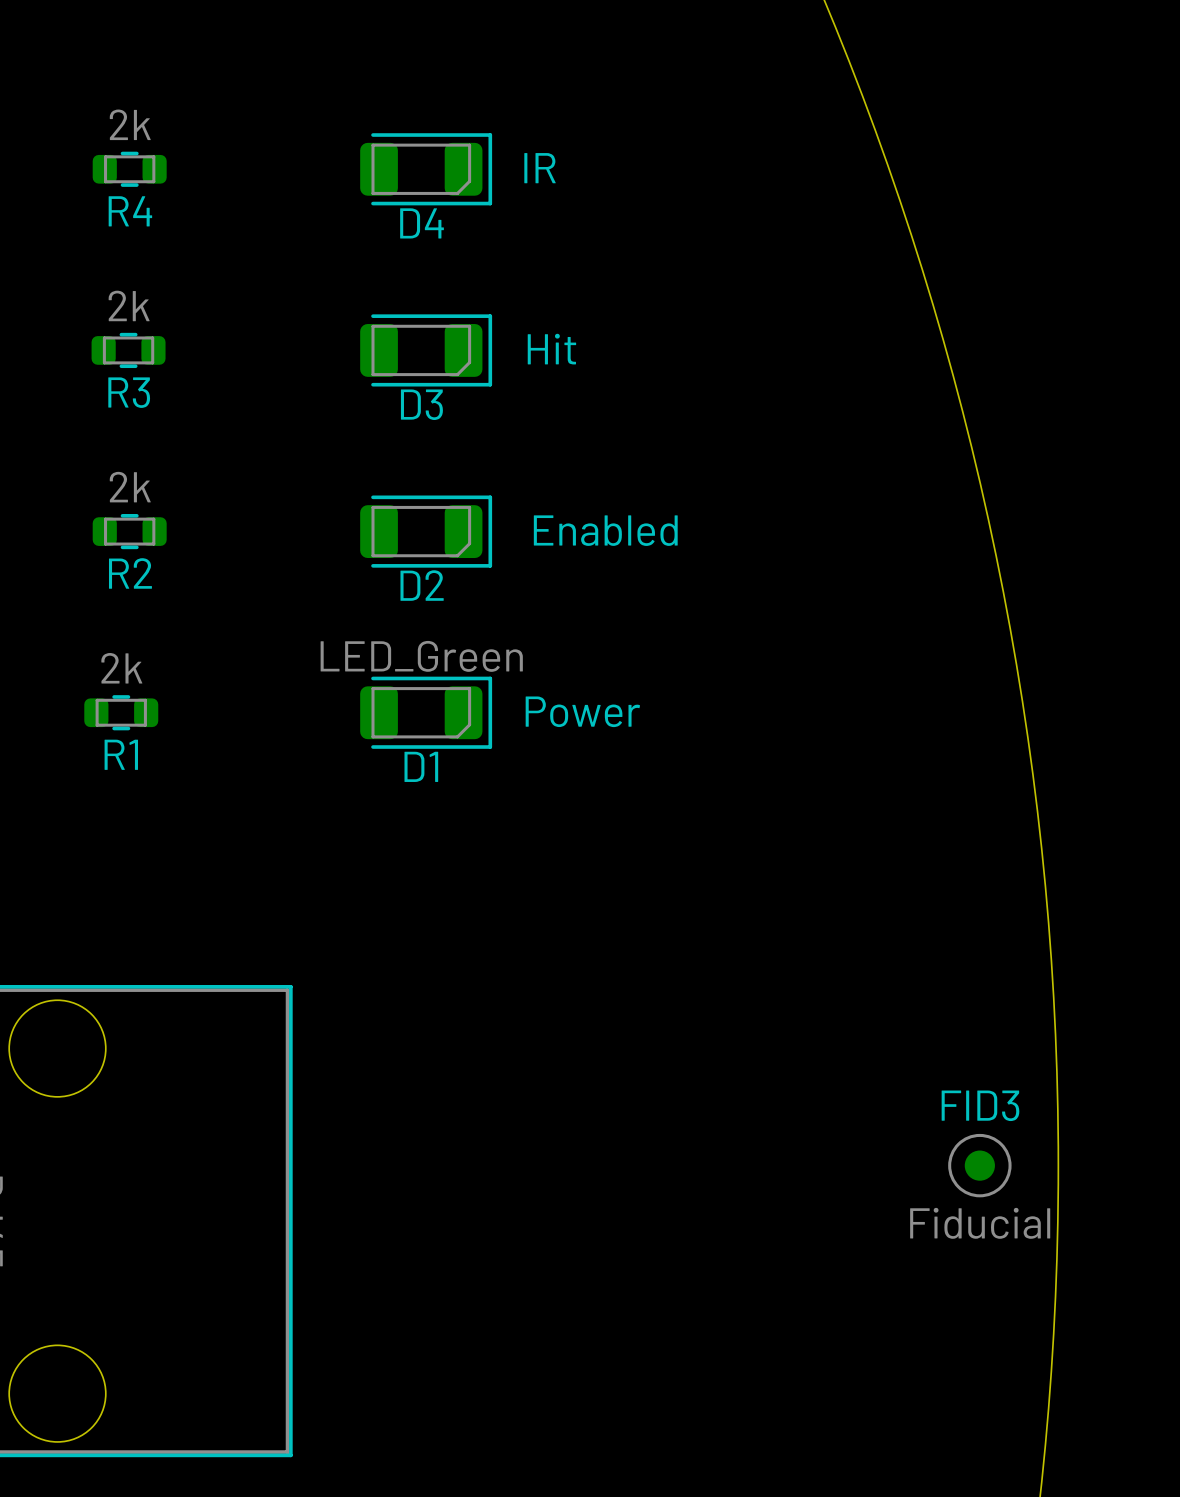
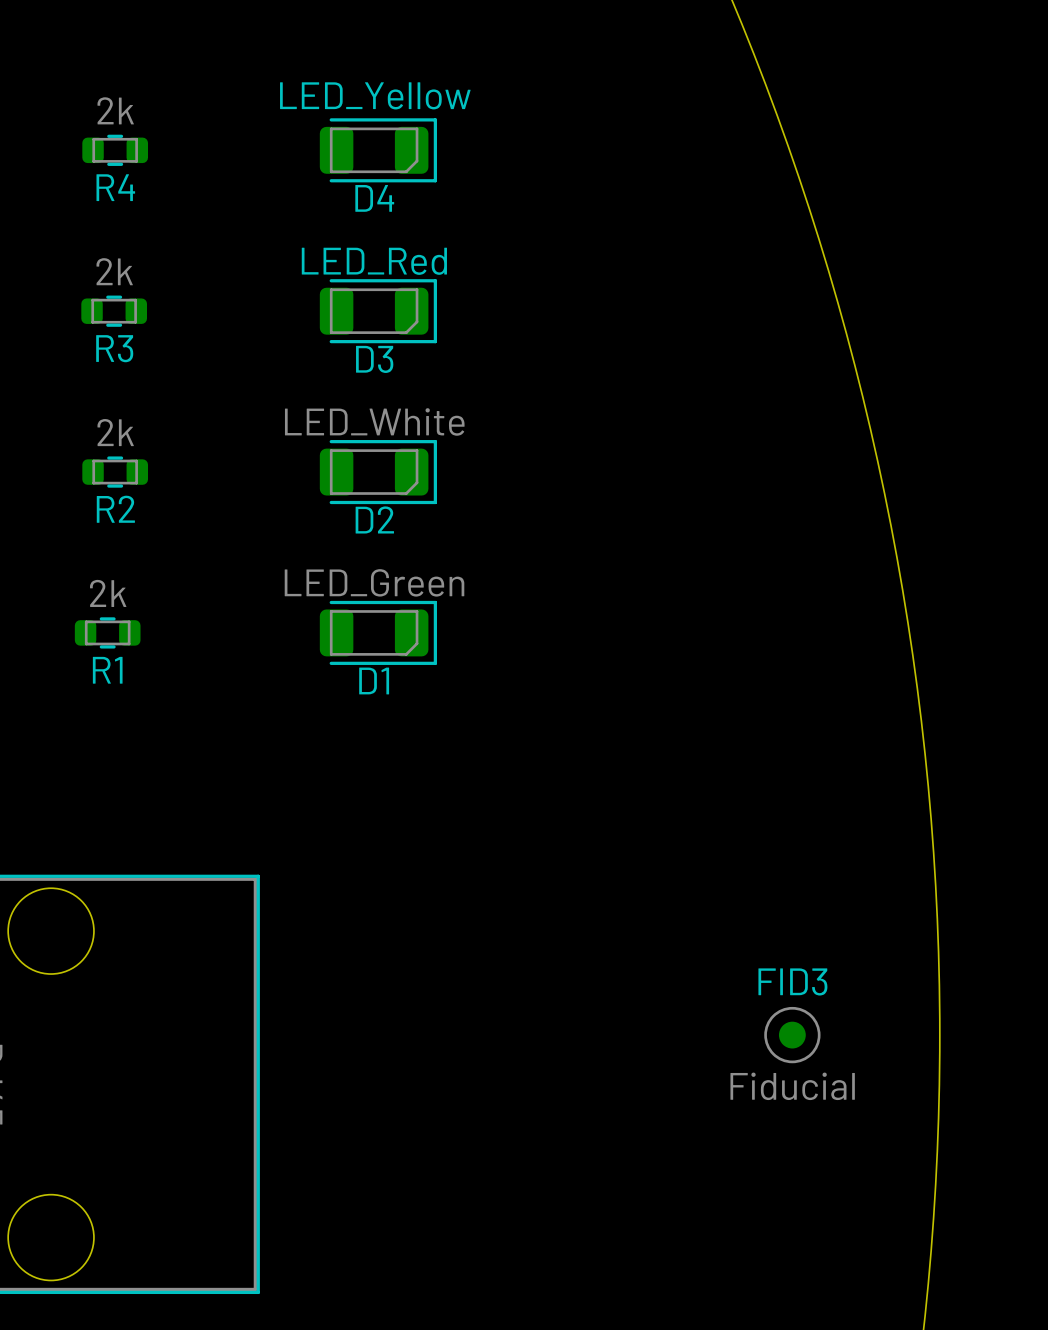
D4 value: none -> LED_Yellow (375, 95)
D4 text: IR (540, 168) -> none
D3 value: none -> LED_Red (374, 261)
D3 text: Hit (551, 349) -> none
D2 value: none -> LED_White (374, 421)
D2 text: Enabled (605, 530) -> none
D1 text: Power (582, 711) -> none
FID3 position: (979, 1165) -> (792, 1035)

